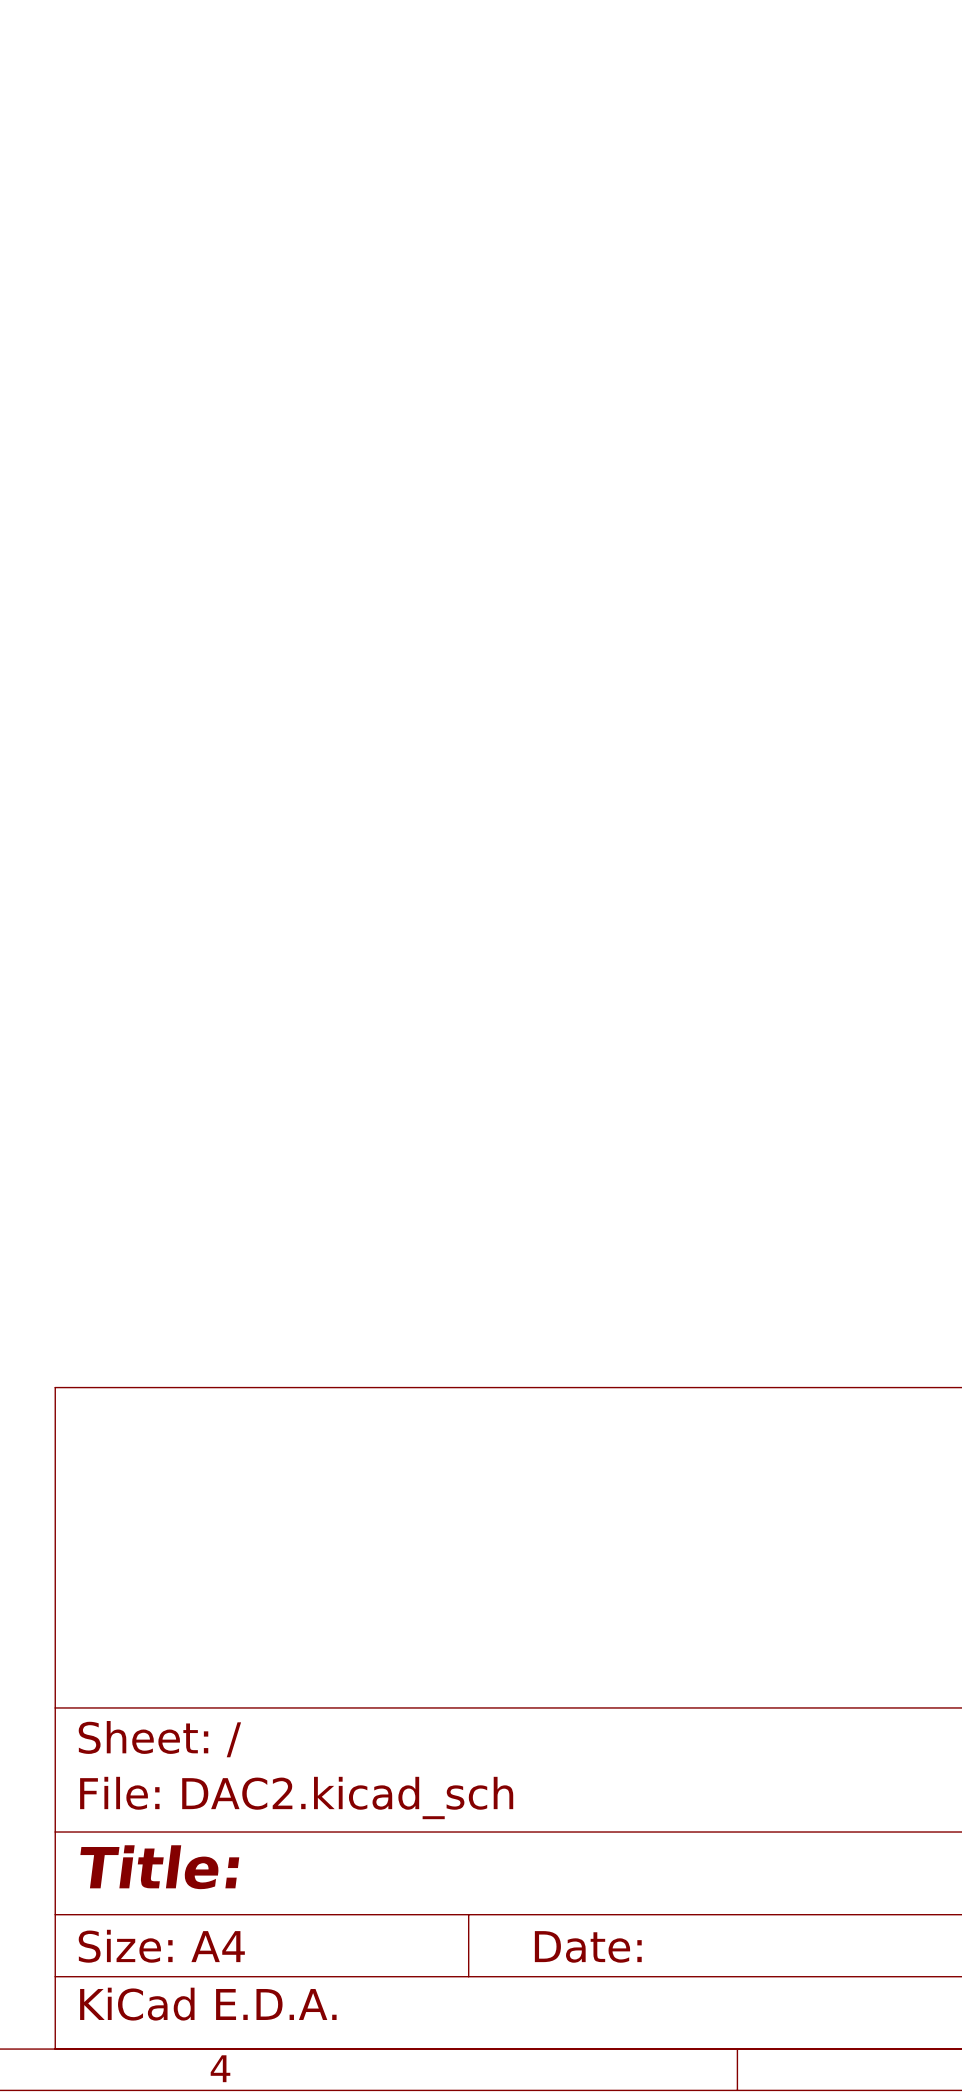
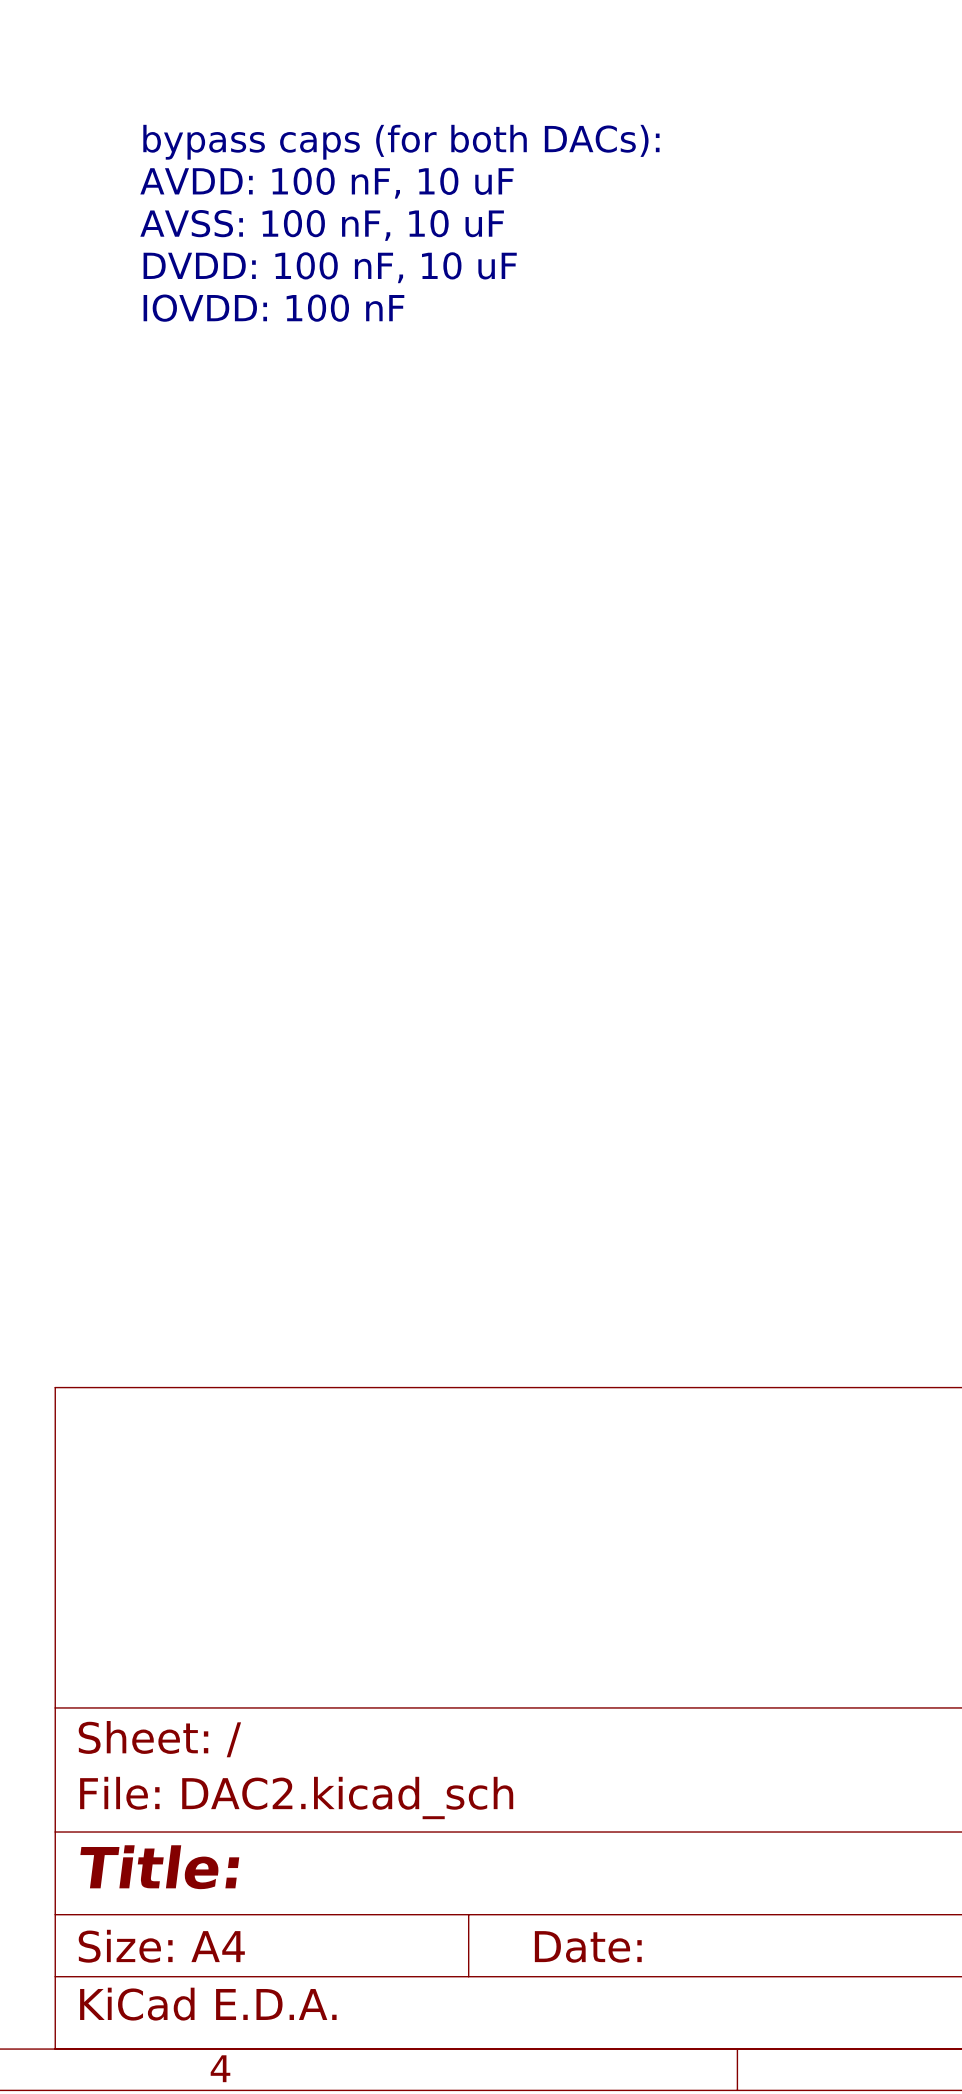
text: none -> bypass caps (for both DACs): (401, 142)
text: none -> AVDD: 100 nF, 10 uF (326, 183)
text: none -> AVSS: 100 nF, 10 uF (322, 225)
text: none -> DVDD: 100 nF, 10 uF (330, 267)
text: none -> IOVDD: 100 nF (273, 308)

